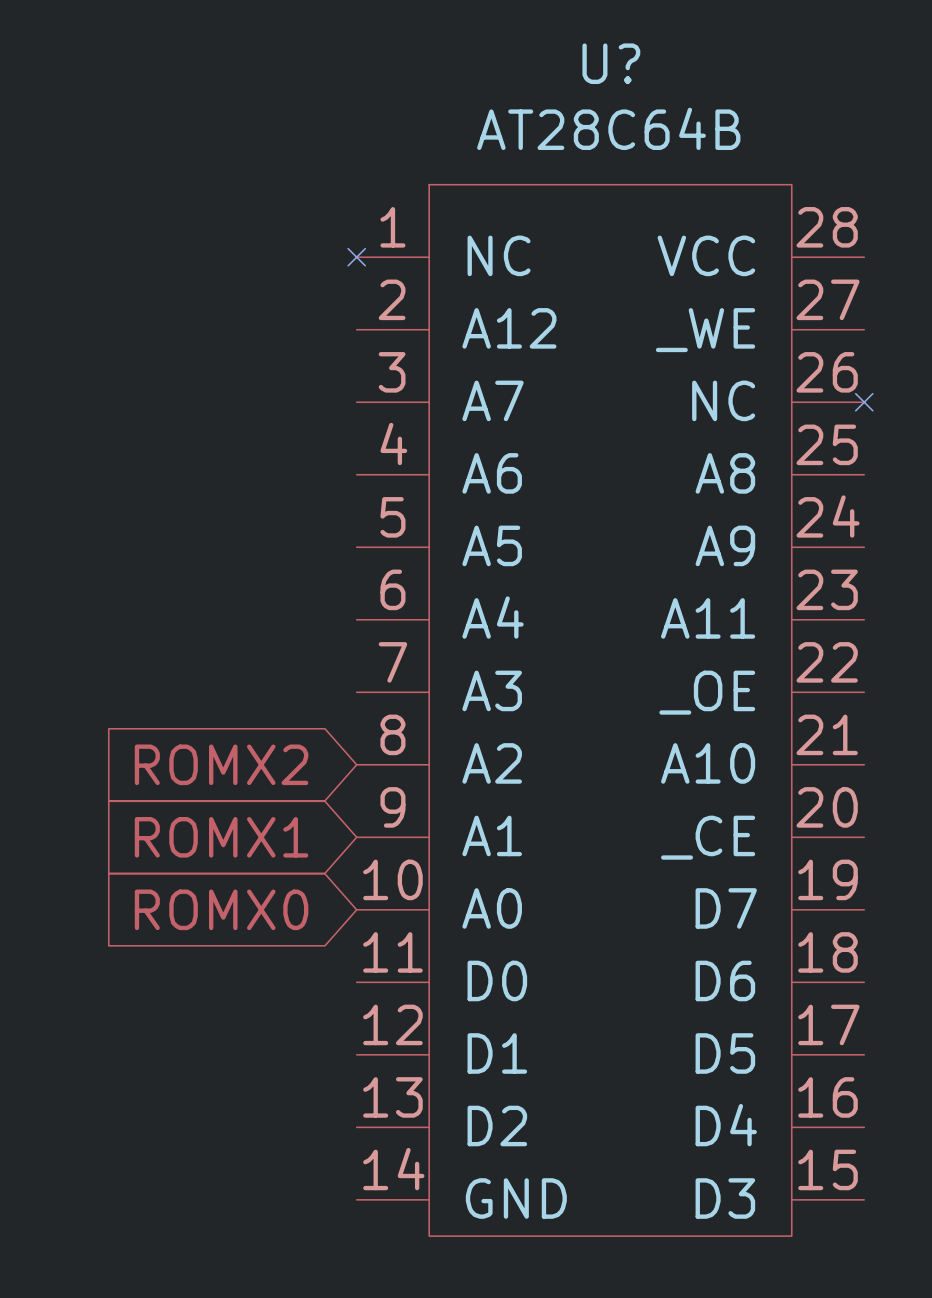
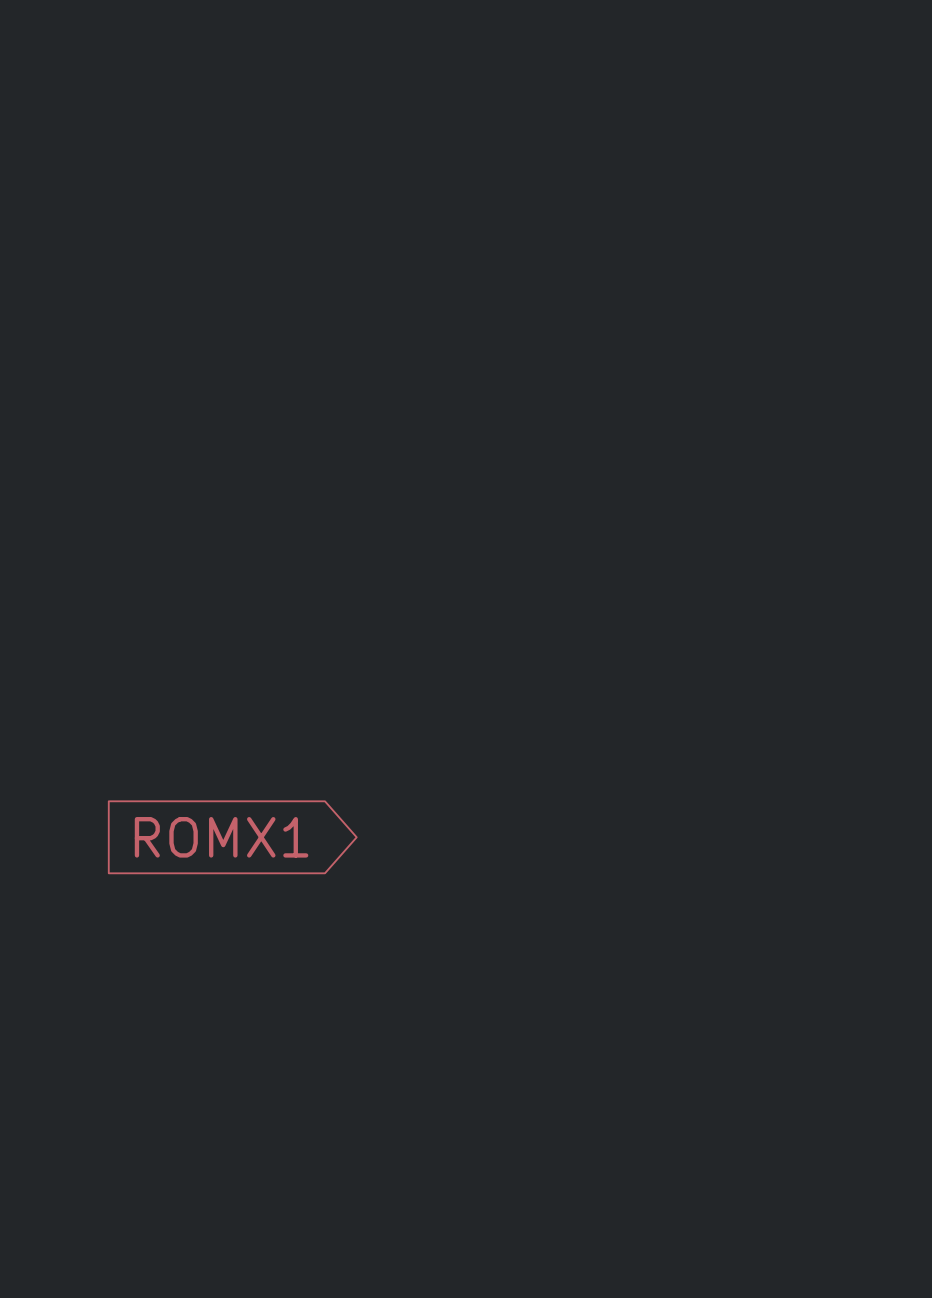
U?: AT28C64B (610, 710) -> none
global label: ROMX2 (221, 764) -> none
global label: ROMX0 (221, 909) -> none

